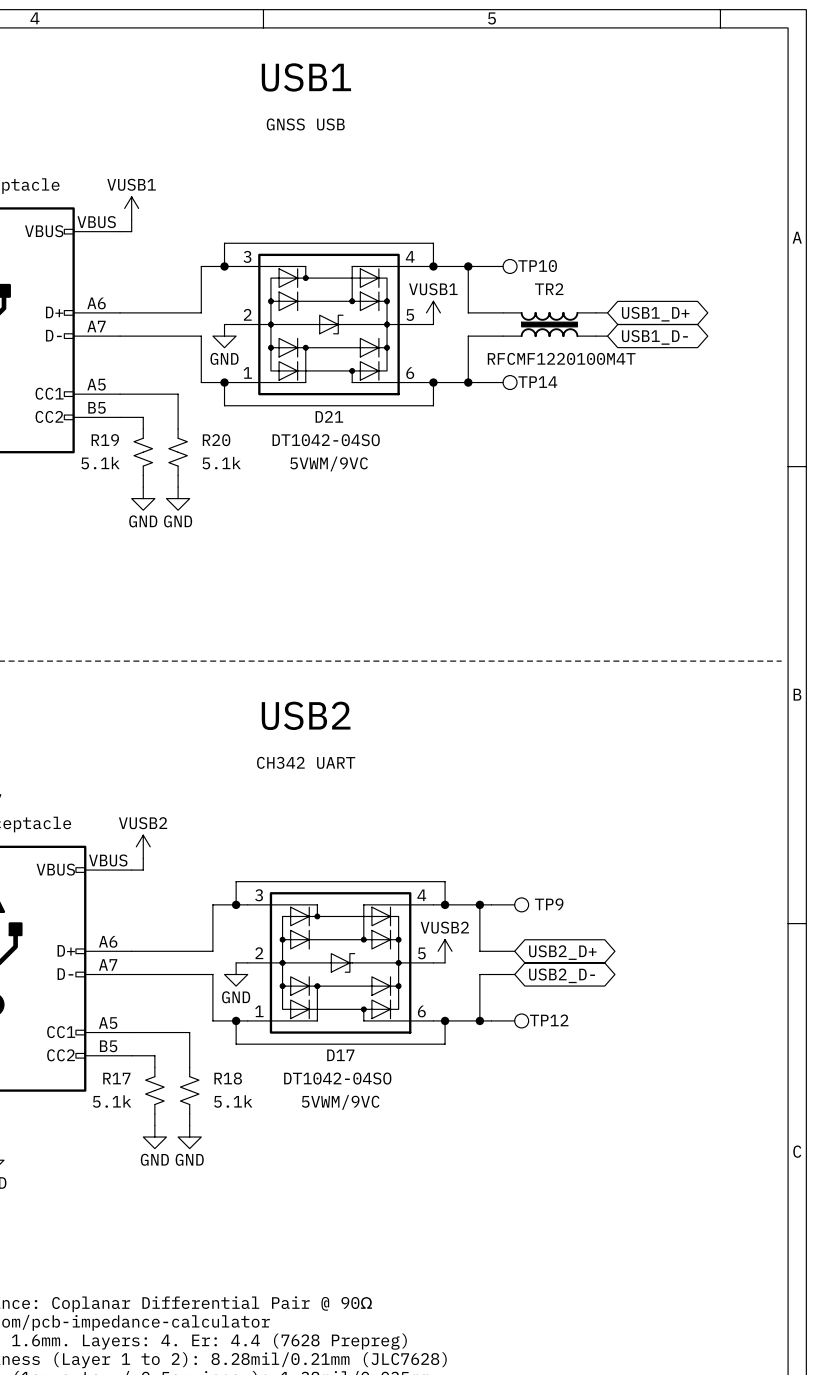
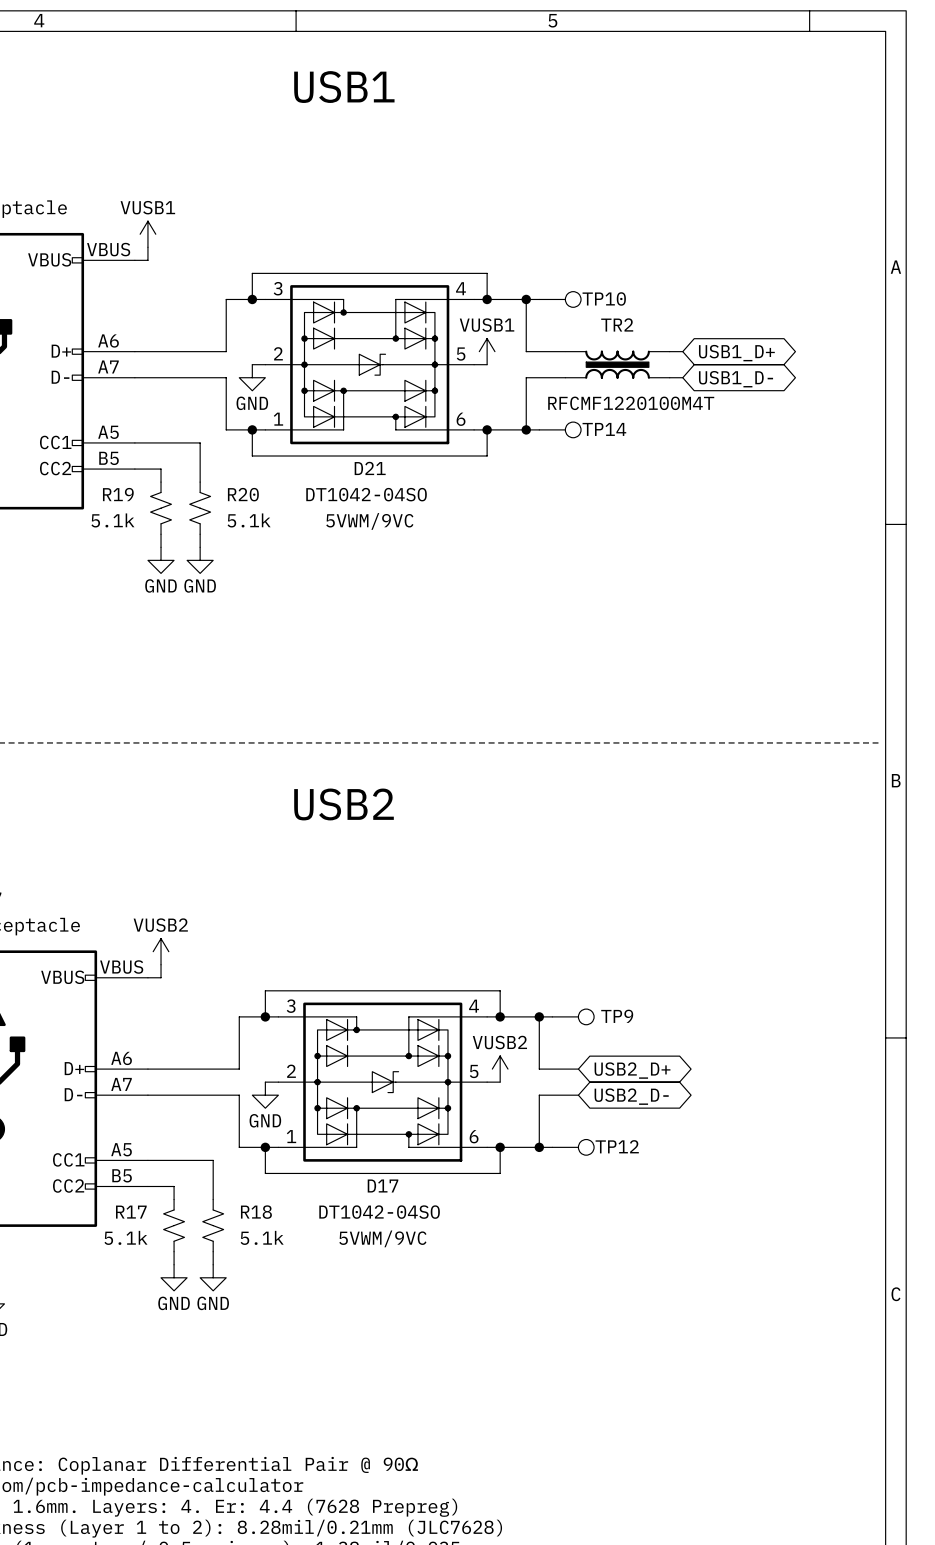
text: GNSS USB (305, 124) -> none
text: CH342 UART (306, 762) -> none

